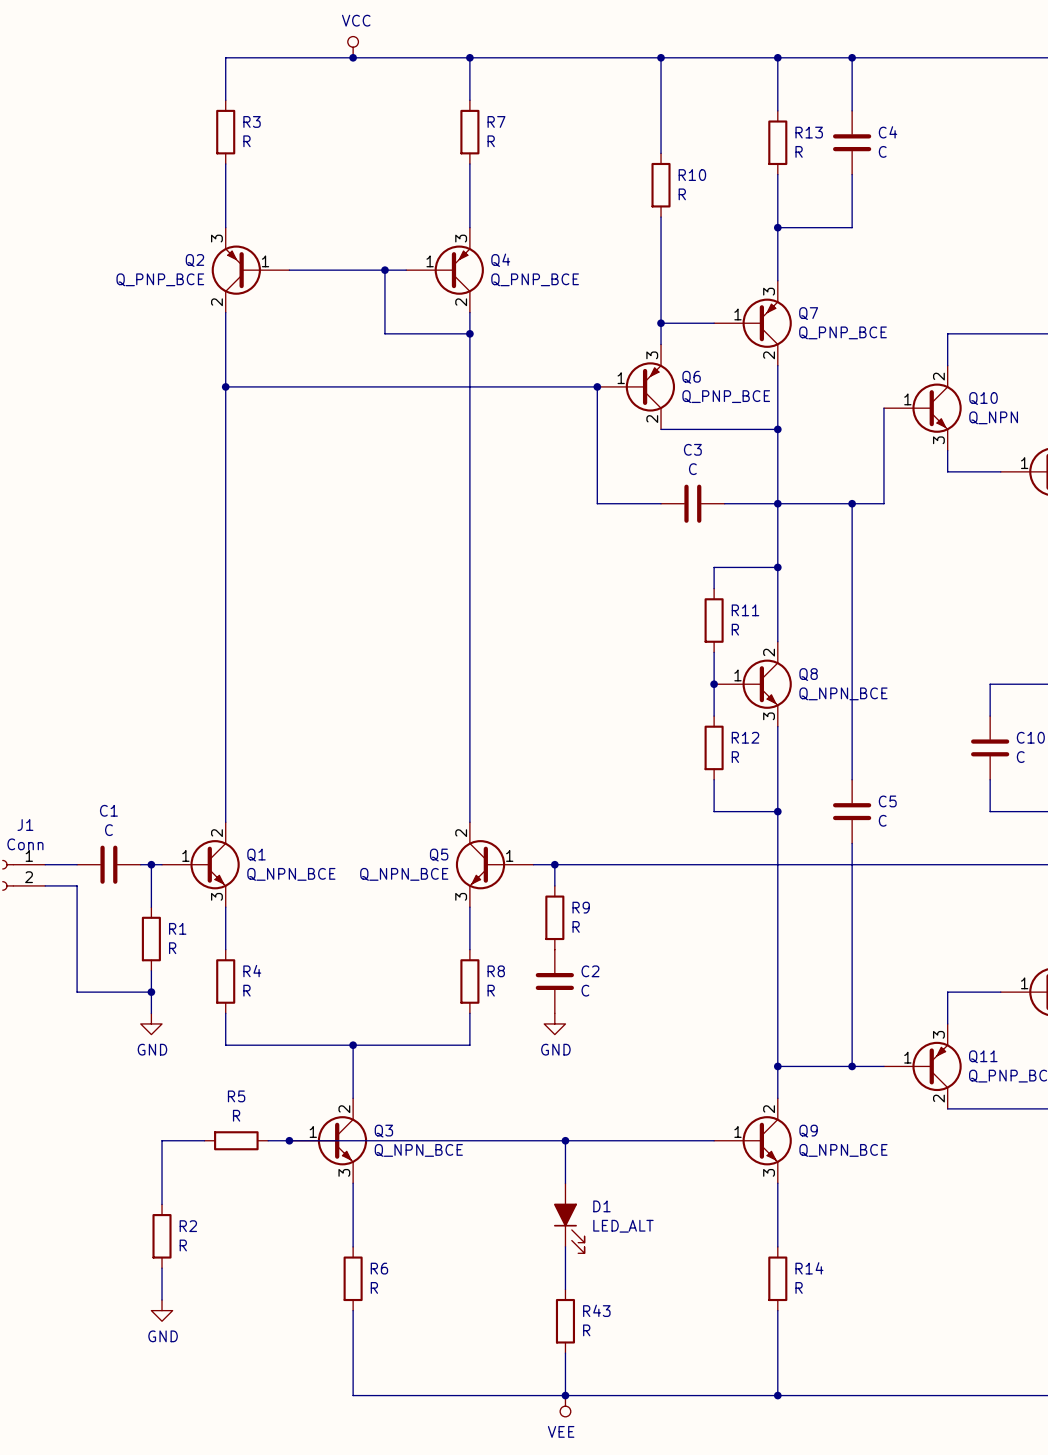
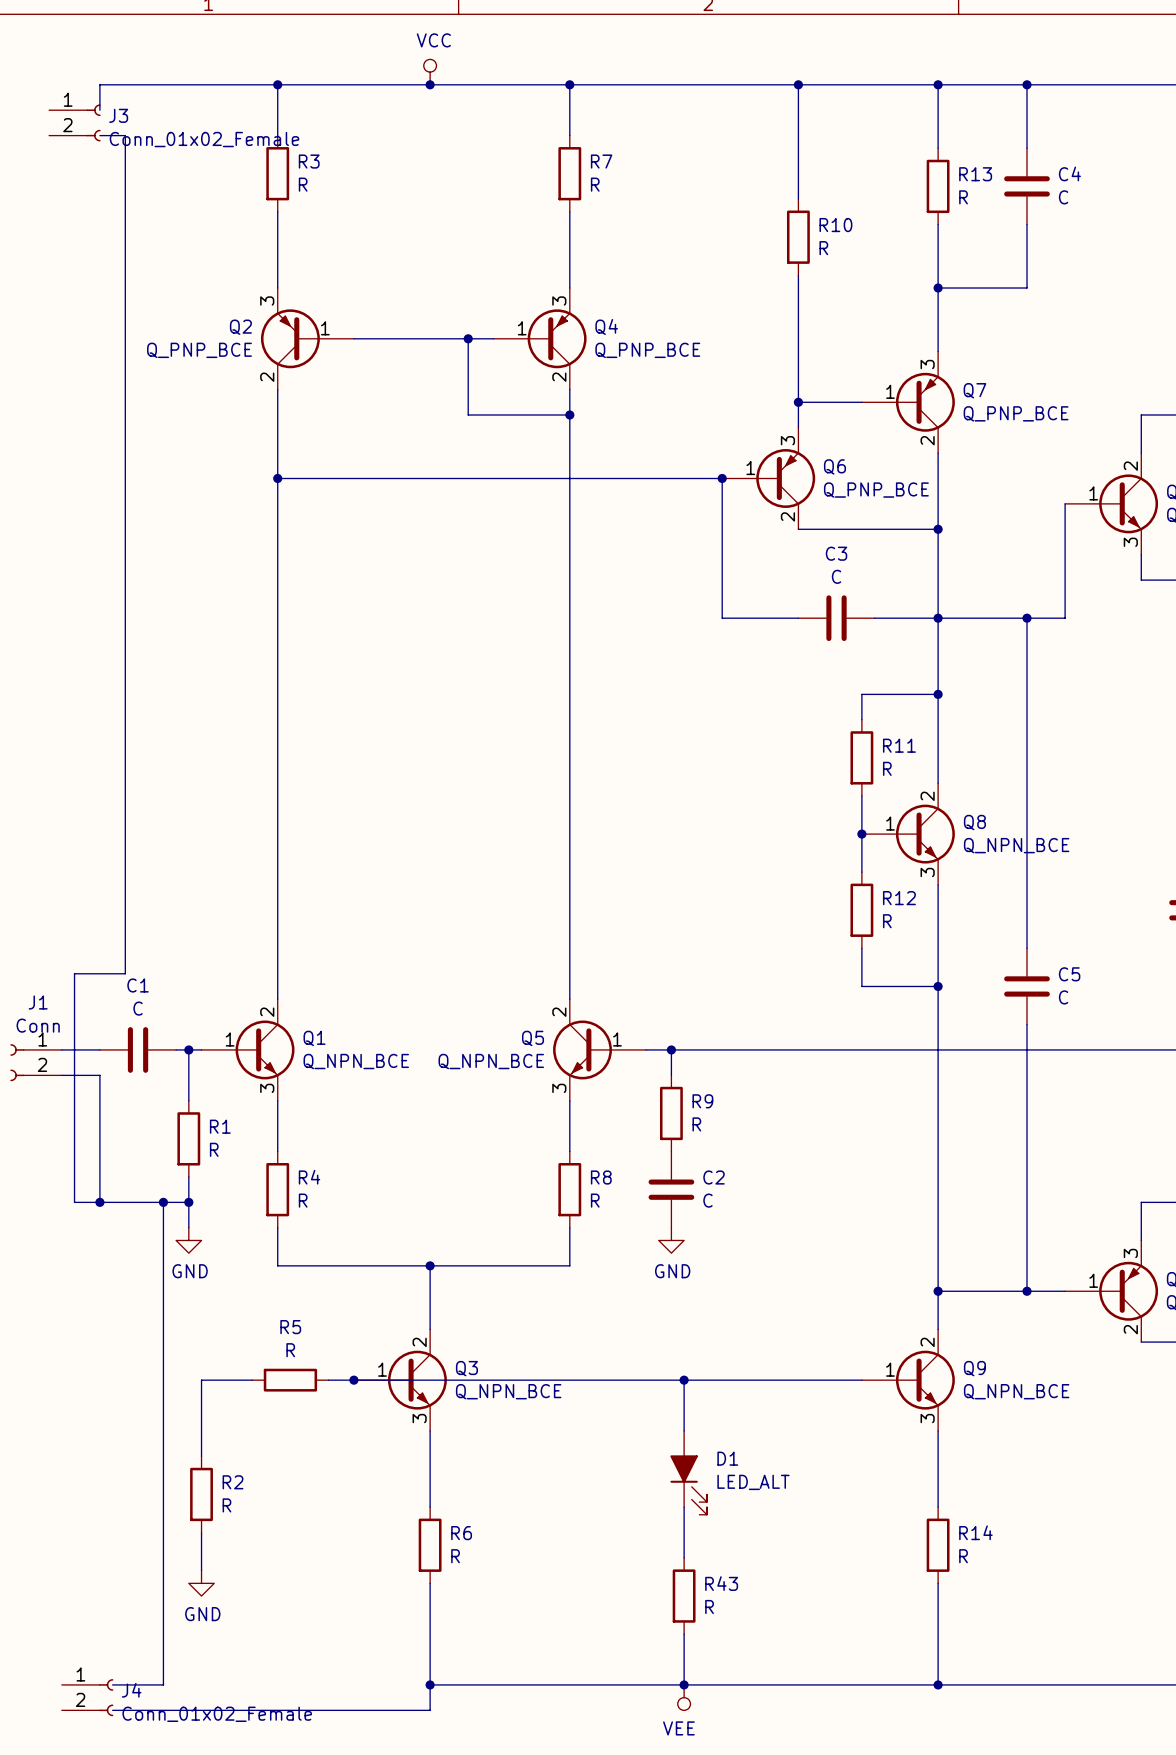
wire: none -> (277, 84) (99, 84) (99, 110)
junction: none -> (277, 84)
J3: none -> Conn_01x02_Female (74, 122)
wire: none -> (99, 135) (125, 135) (125, 973) (74, 973) (74, 1202) (99, 1202)
junction: none -> (99, 1202)
wire: none -> (163, 1202) (163, 1684) (112, 1684)
junction: none -> (163, 1202)
wire: none -> (430, 1684) (430, 1710) (112, 1710)
junction: none -> (430, 1684)
J4: none -> Conn_01x02_Female (87, 1697)

